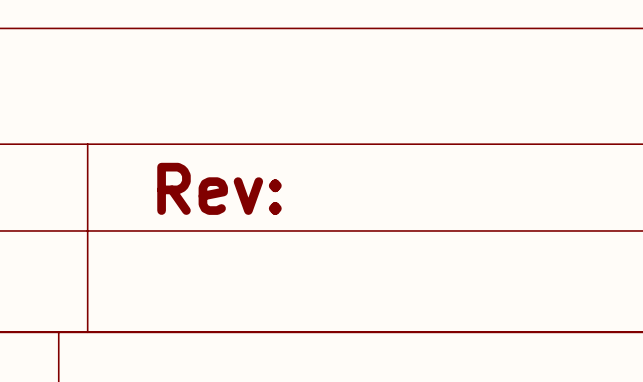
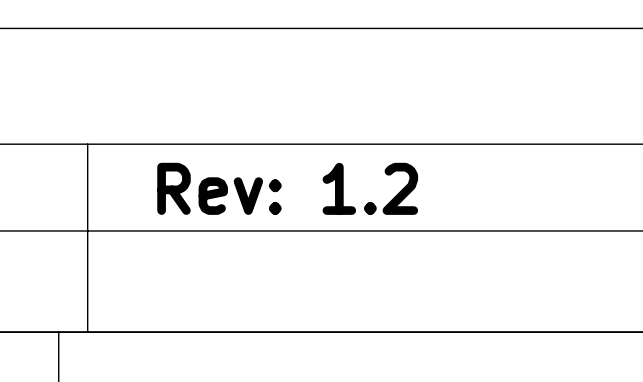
title block: Rev: (219, 188) -> Rev: 1.2 (287, 188)

